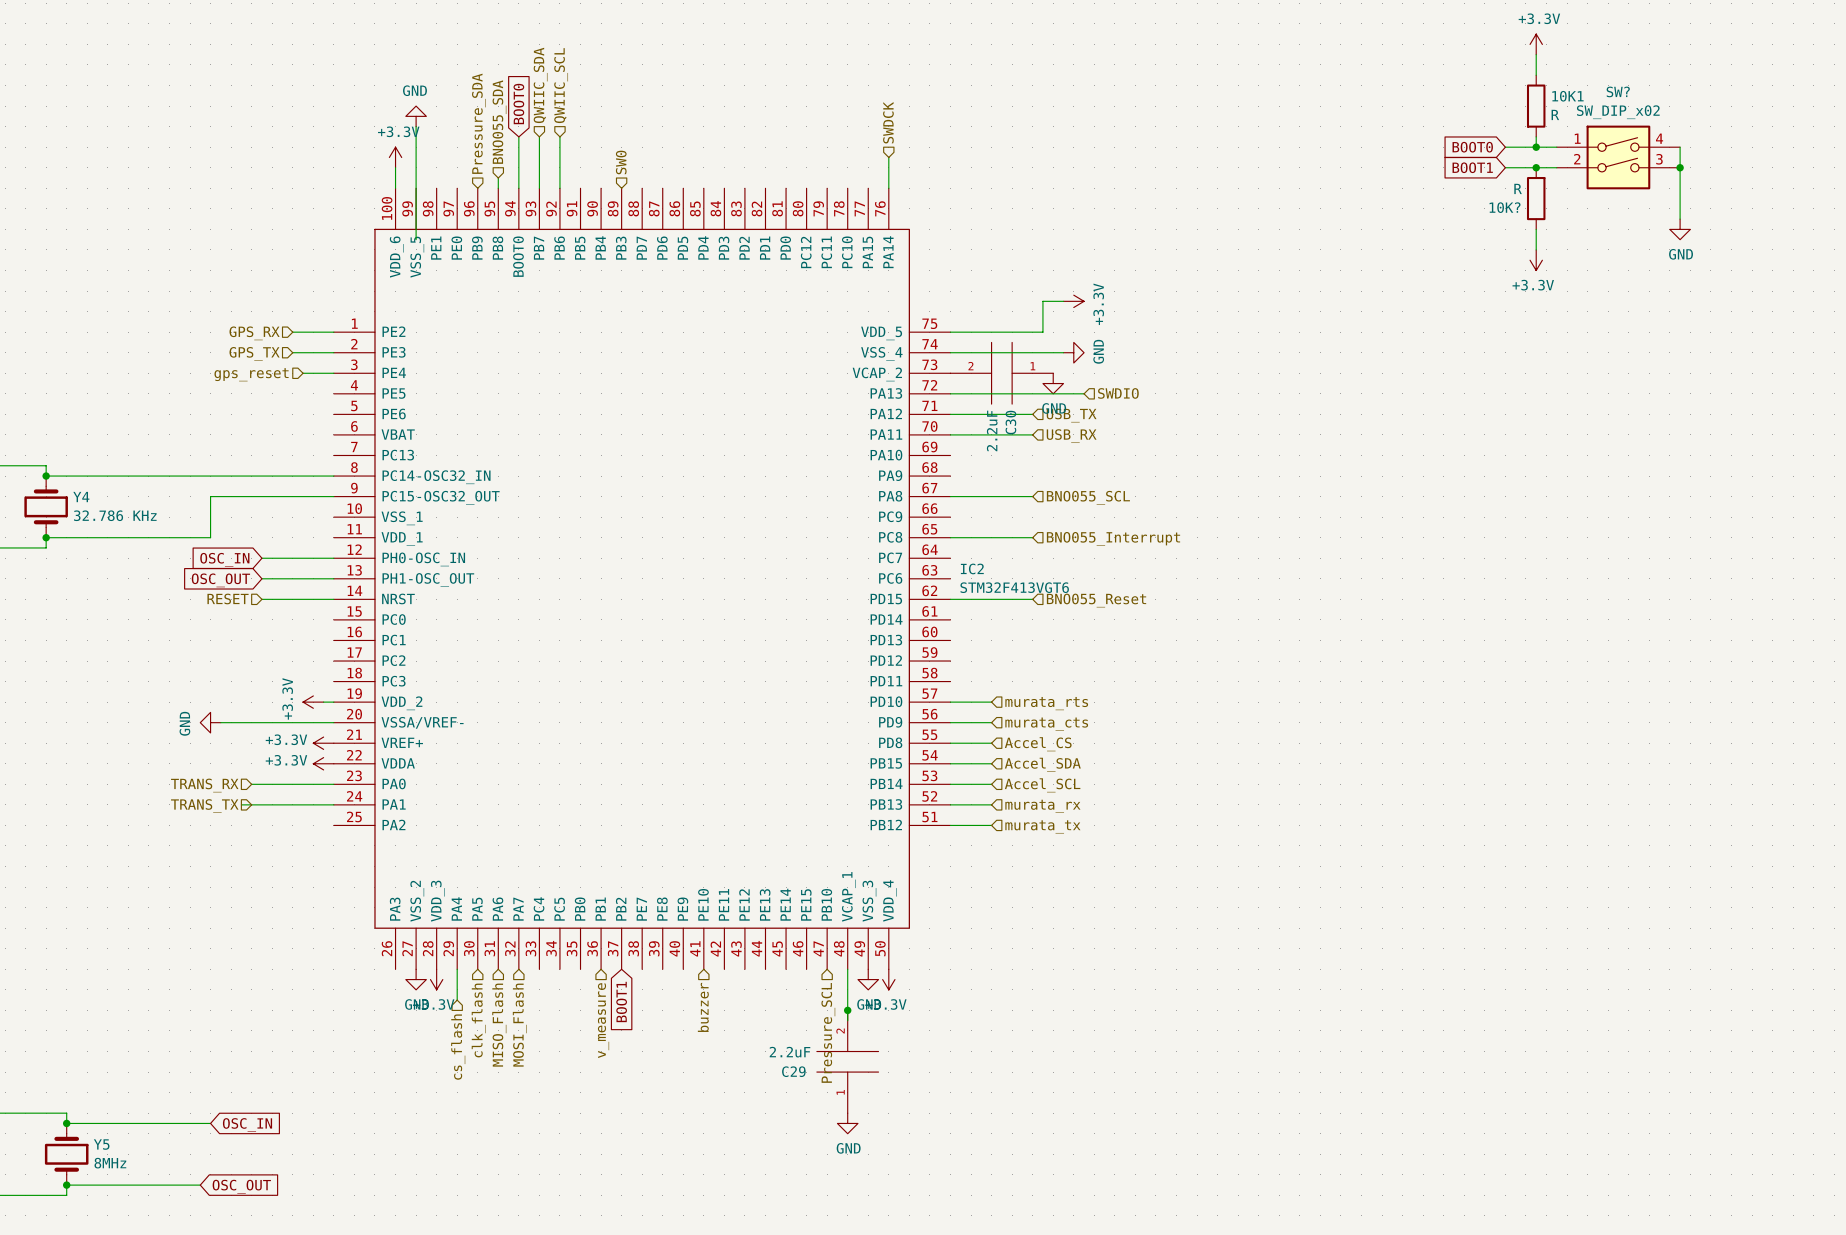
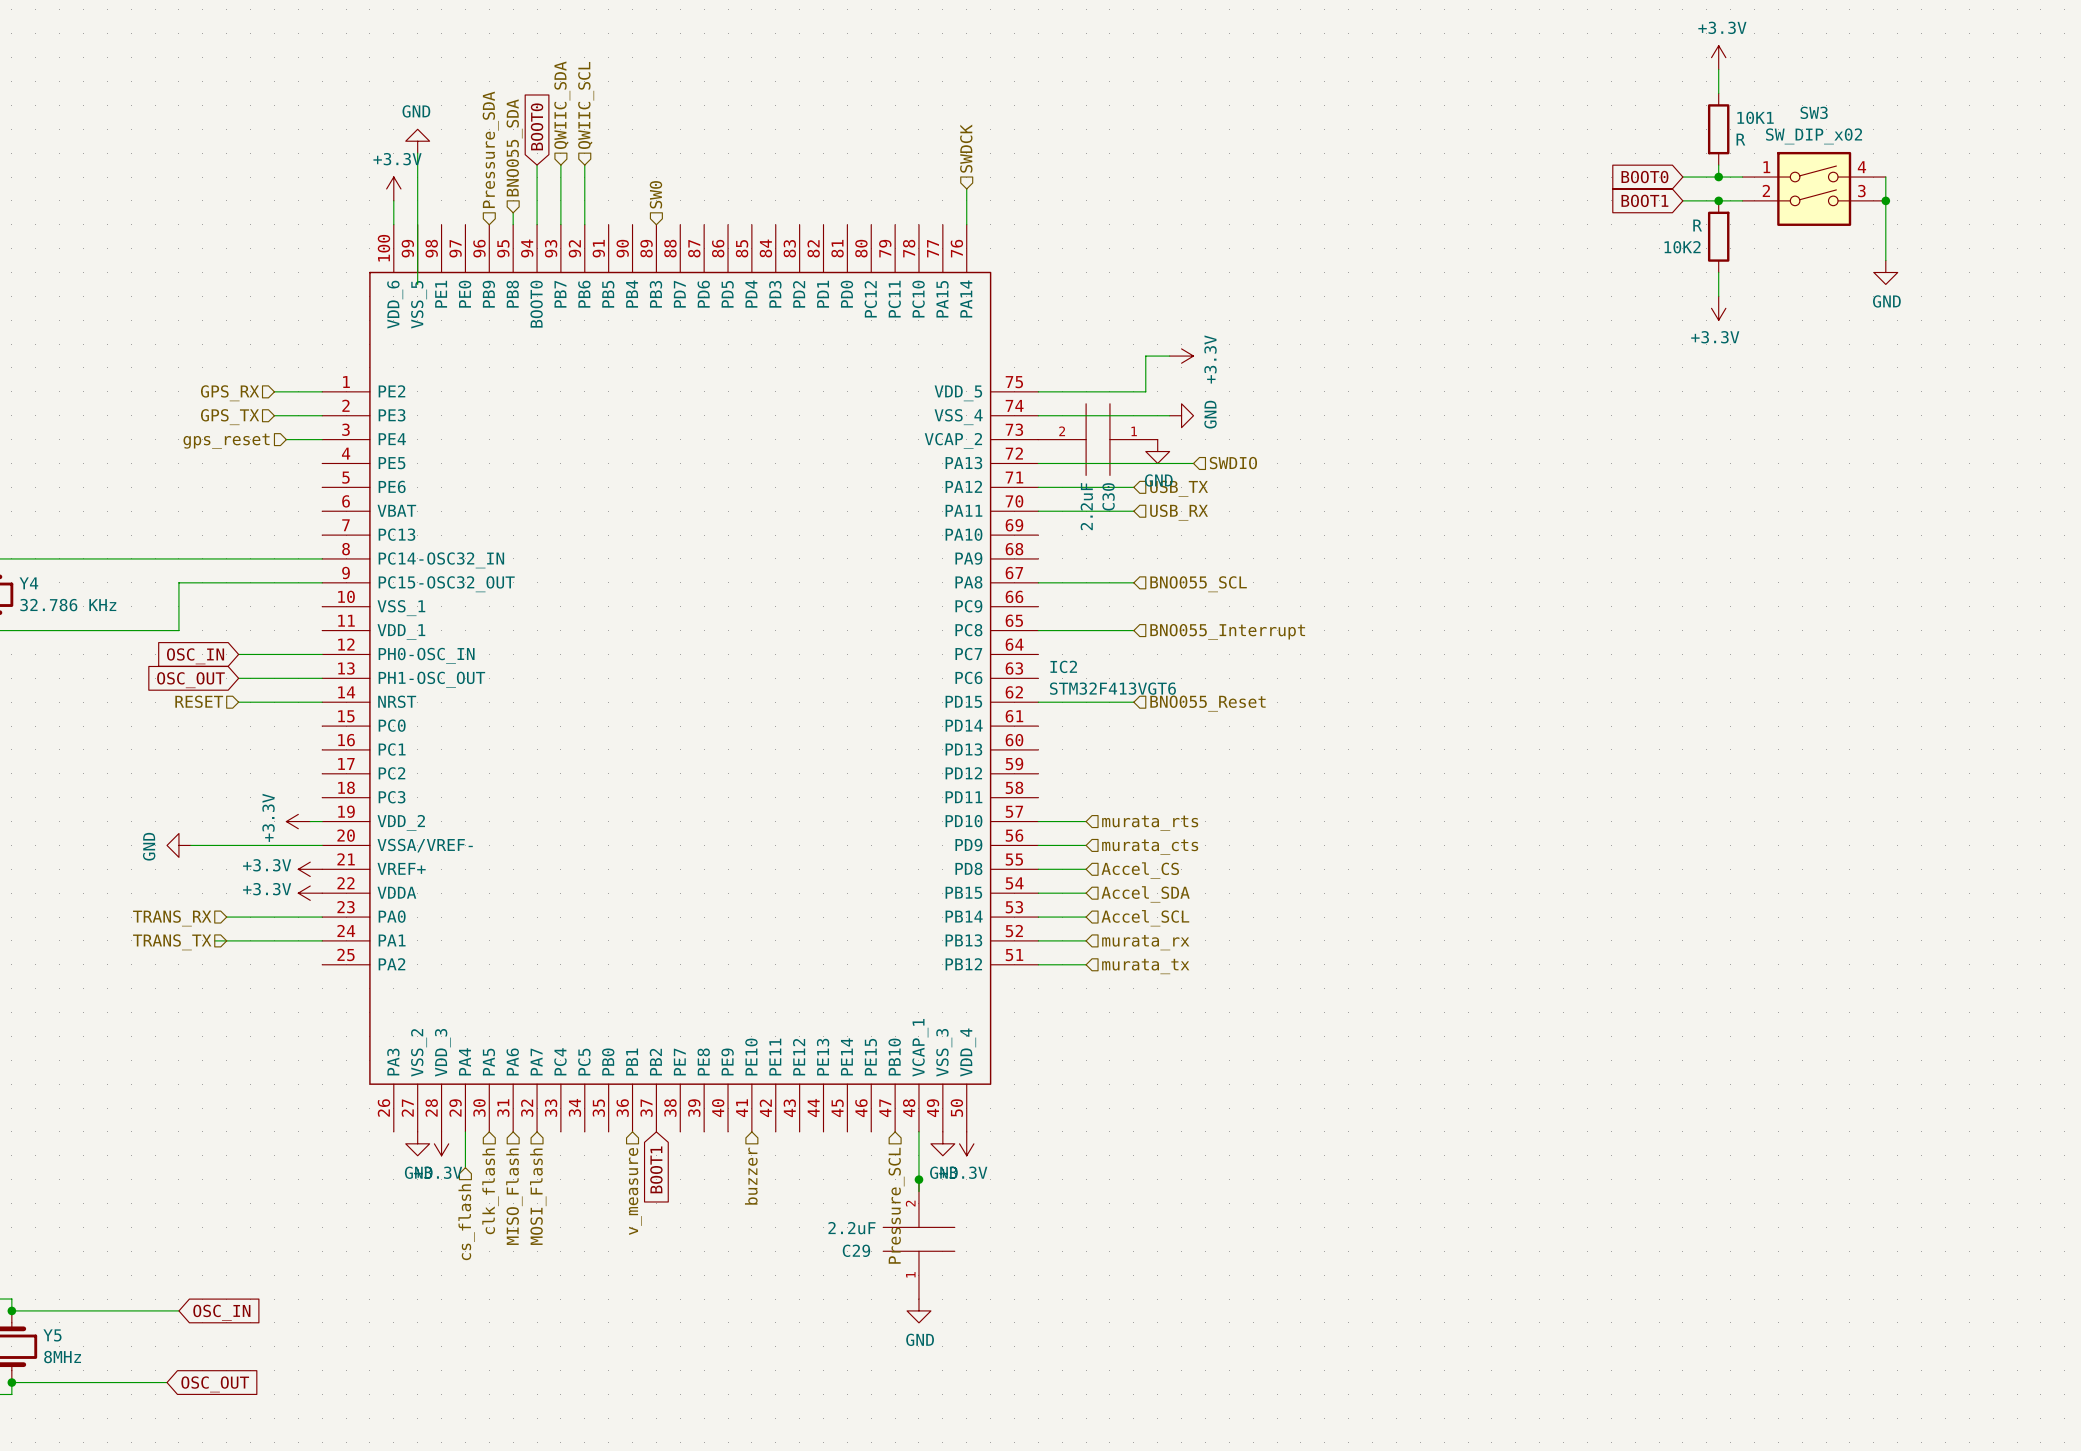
SW? name: SW? (1618, 91) -> SW3 (1814, 112)
10K? name: 10K? (1505, 207) -> 10K2 (1682, 247)

